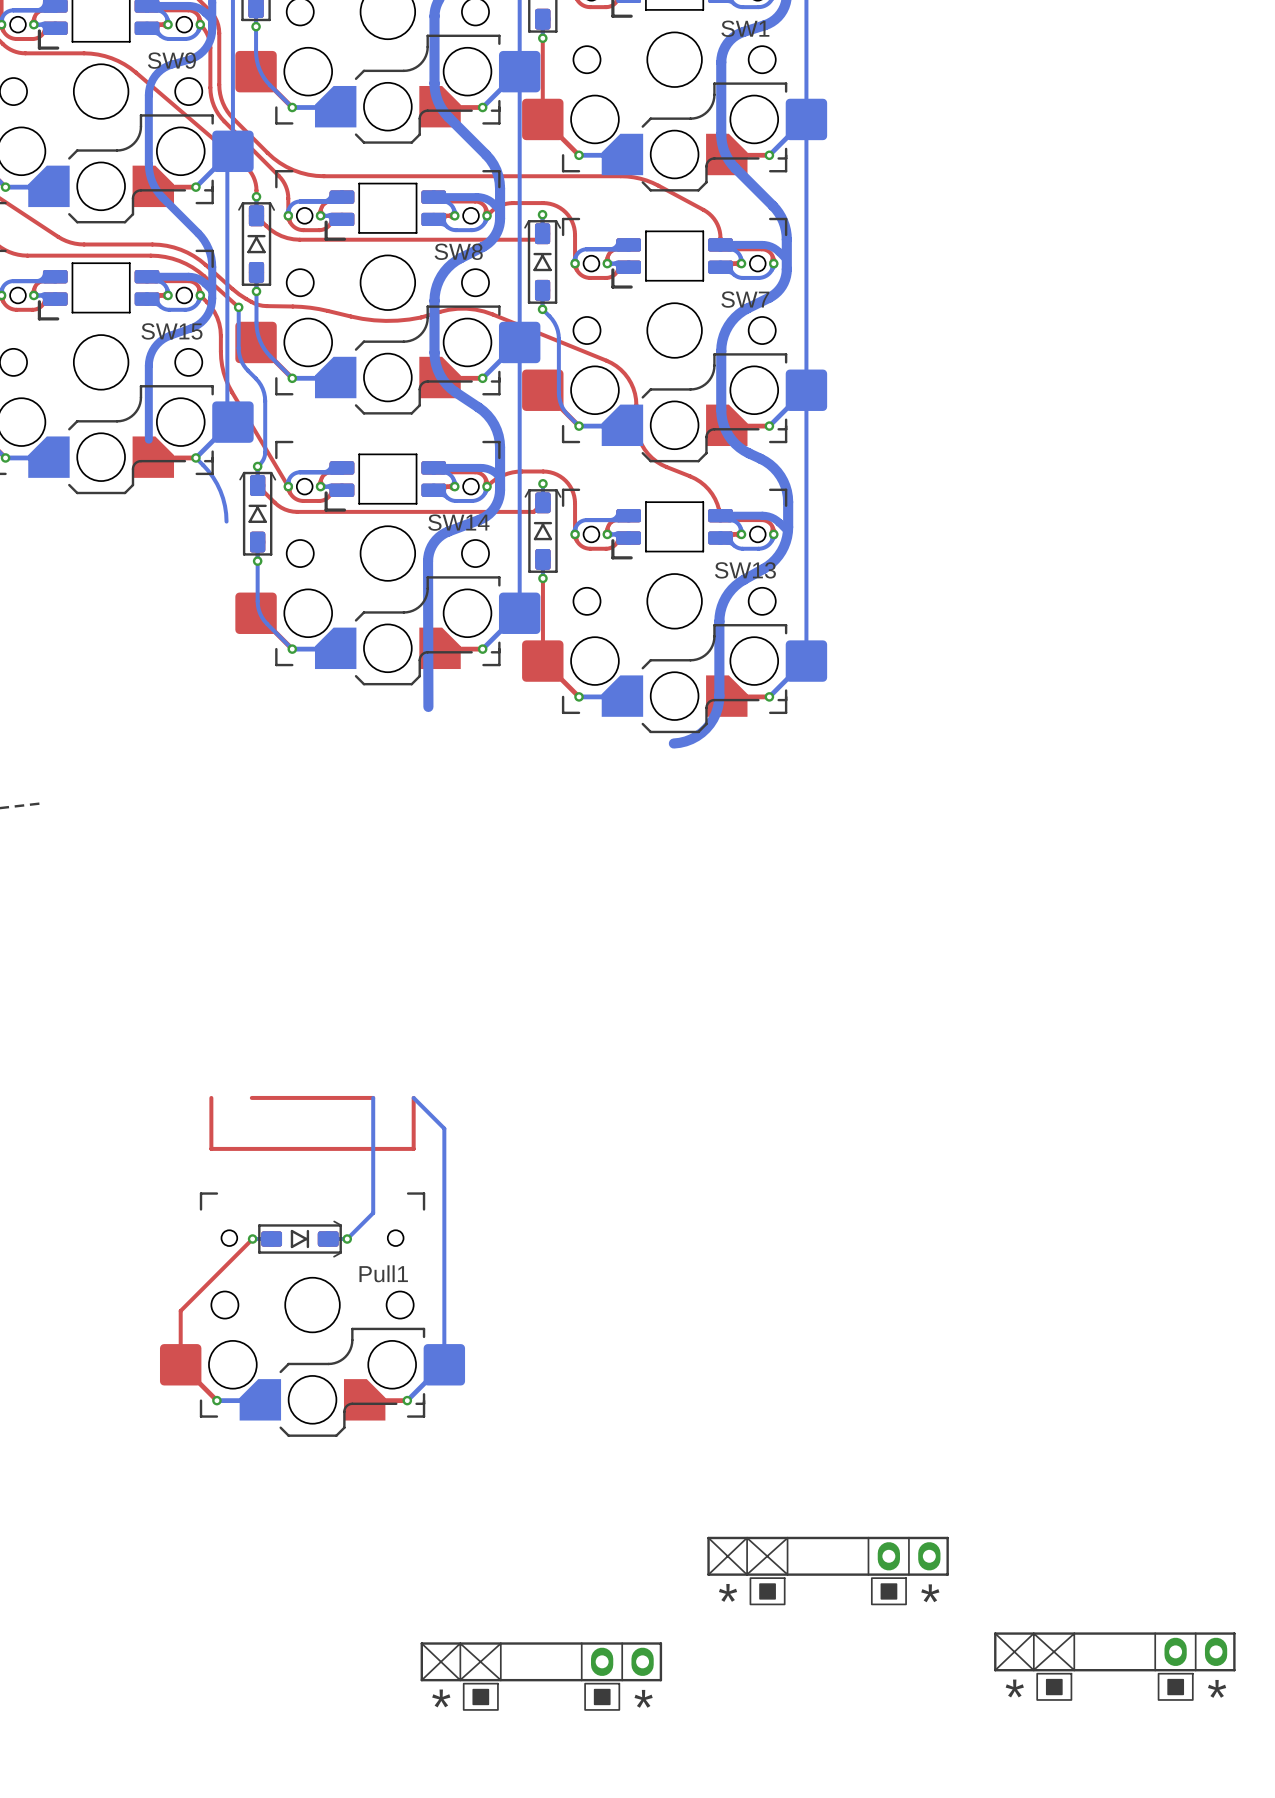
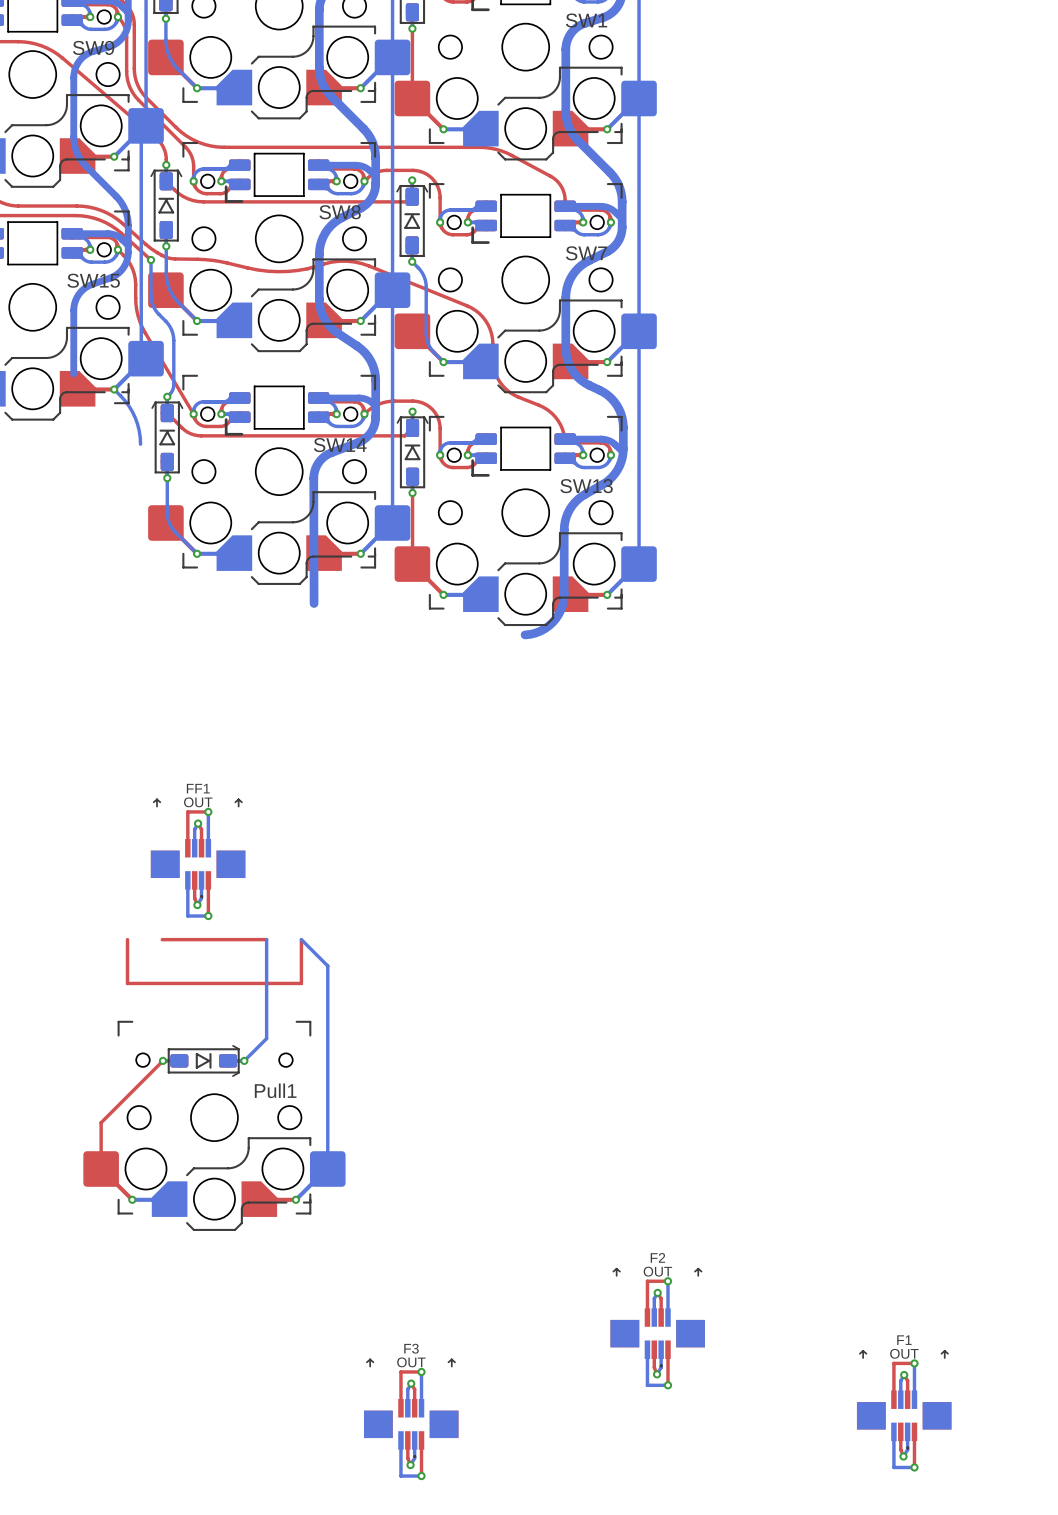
FF1: none -> (198, 859)
F2: none -> (657, 1328)
part: (828, 1570) -> none
F1: none -> (904, 1410)
F3: none -> (411, 1419)
part: (1114, 1666) -> none
part: (541, 1676) -> none

